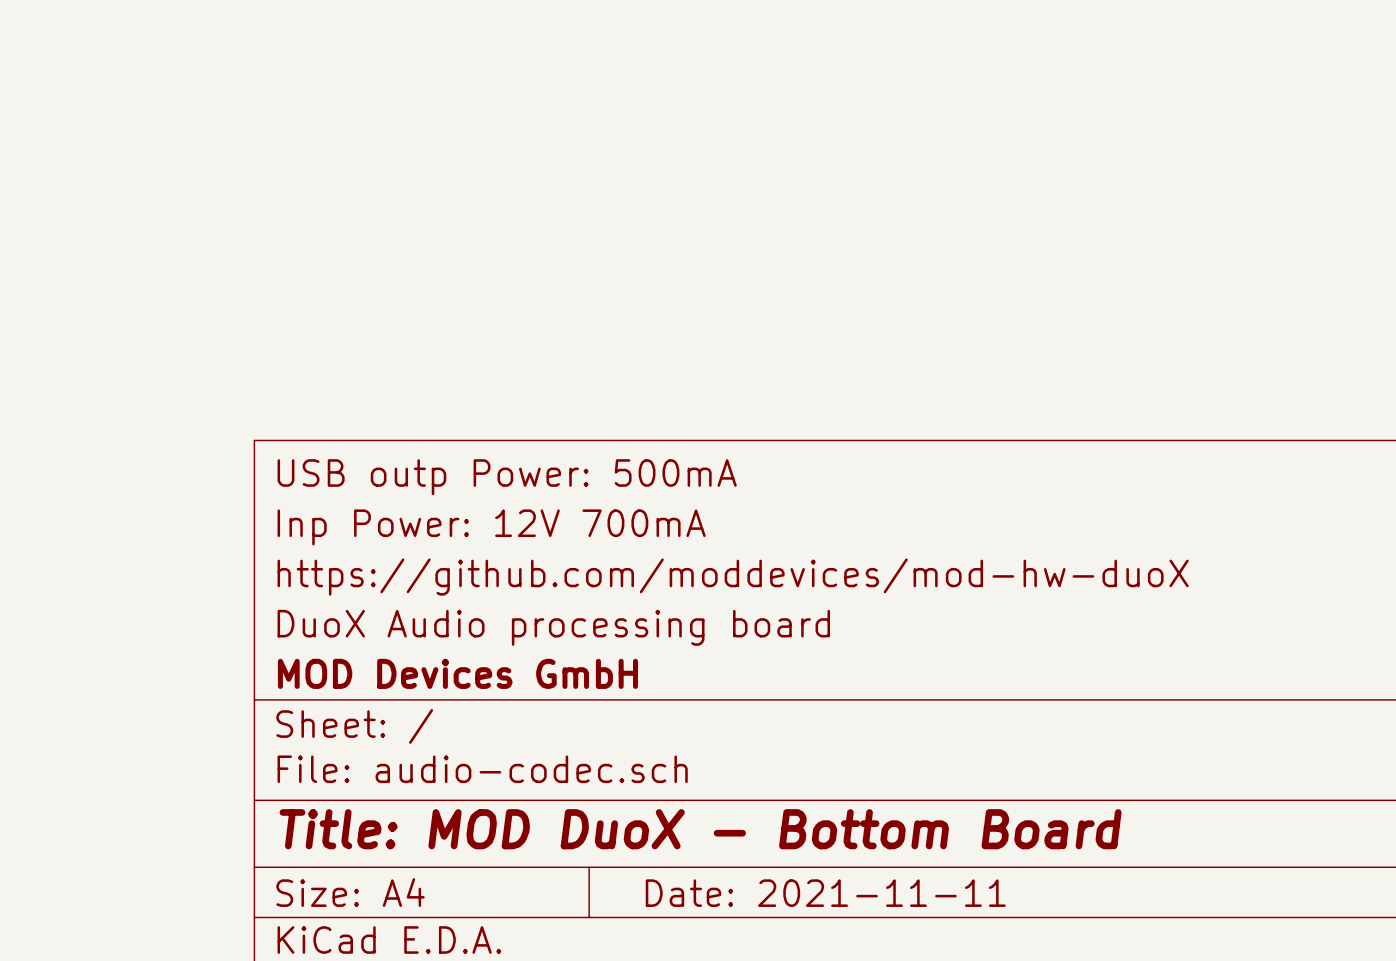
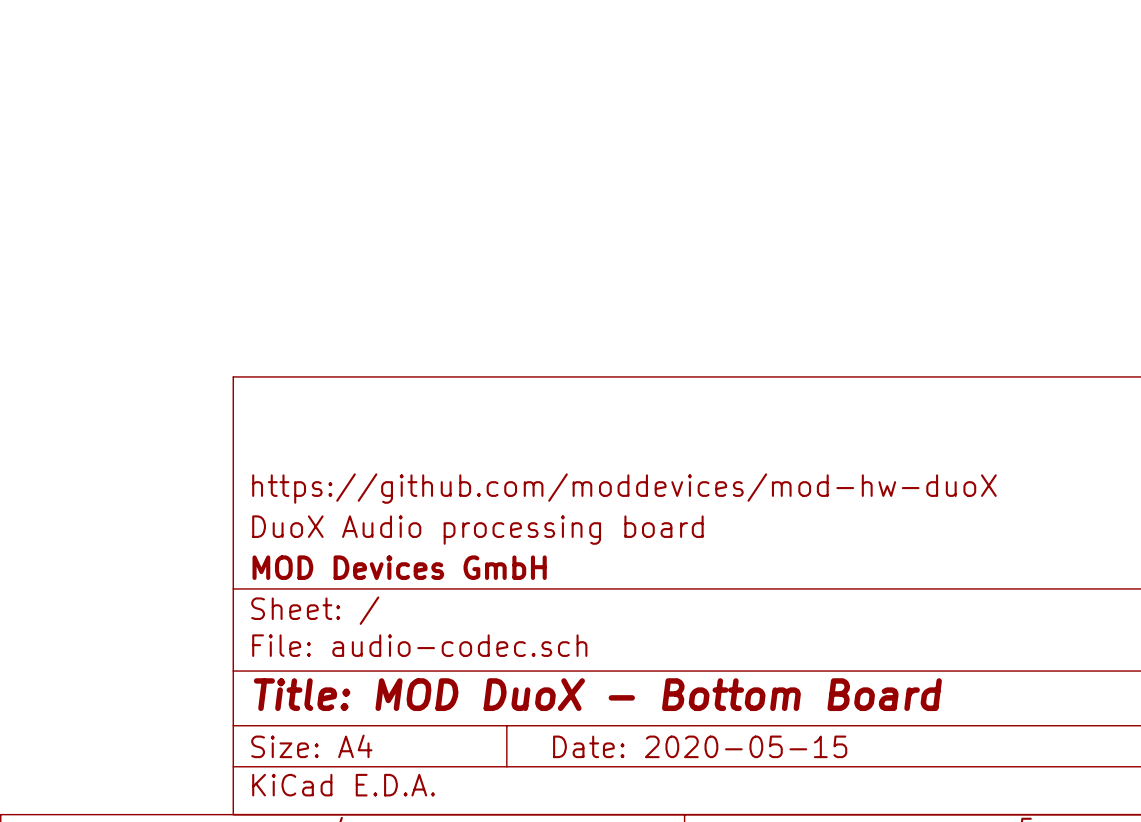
title block: USB outp Power: 500mA (507, 477) -> none
title block: Inp Power: 12V 700mA (491, 527) -> none
title block: Date: 2021-11-11 (825, 893) -> Date: 2020-05-15 (700, 746)

